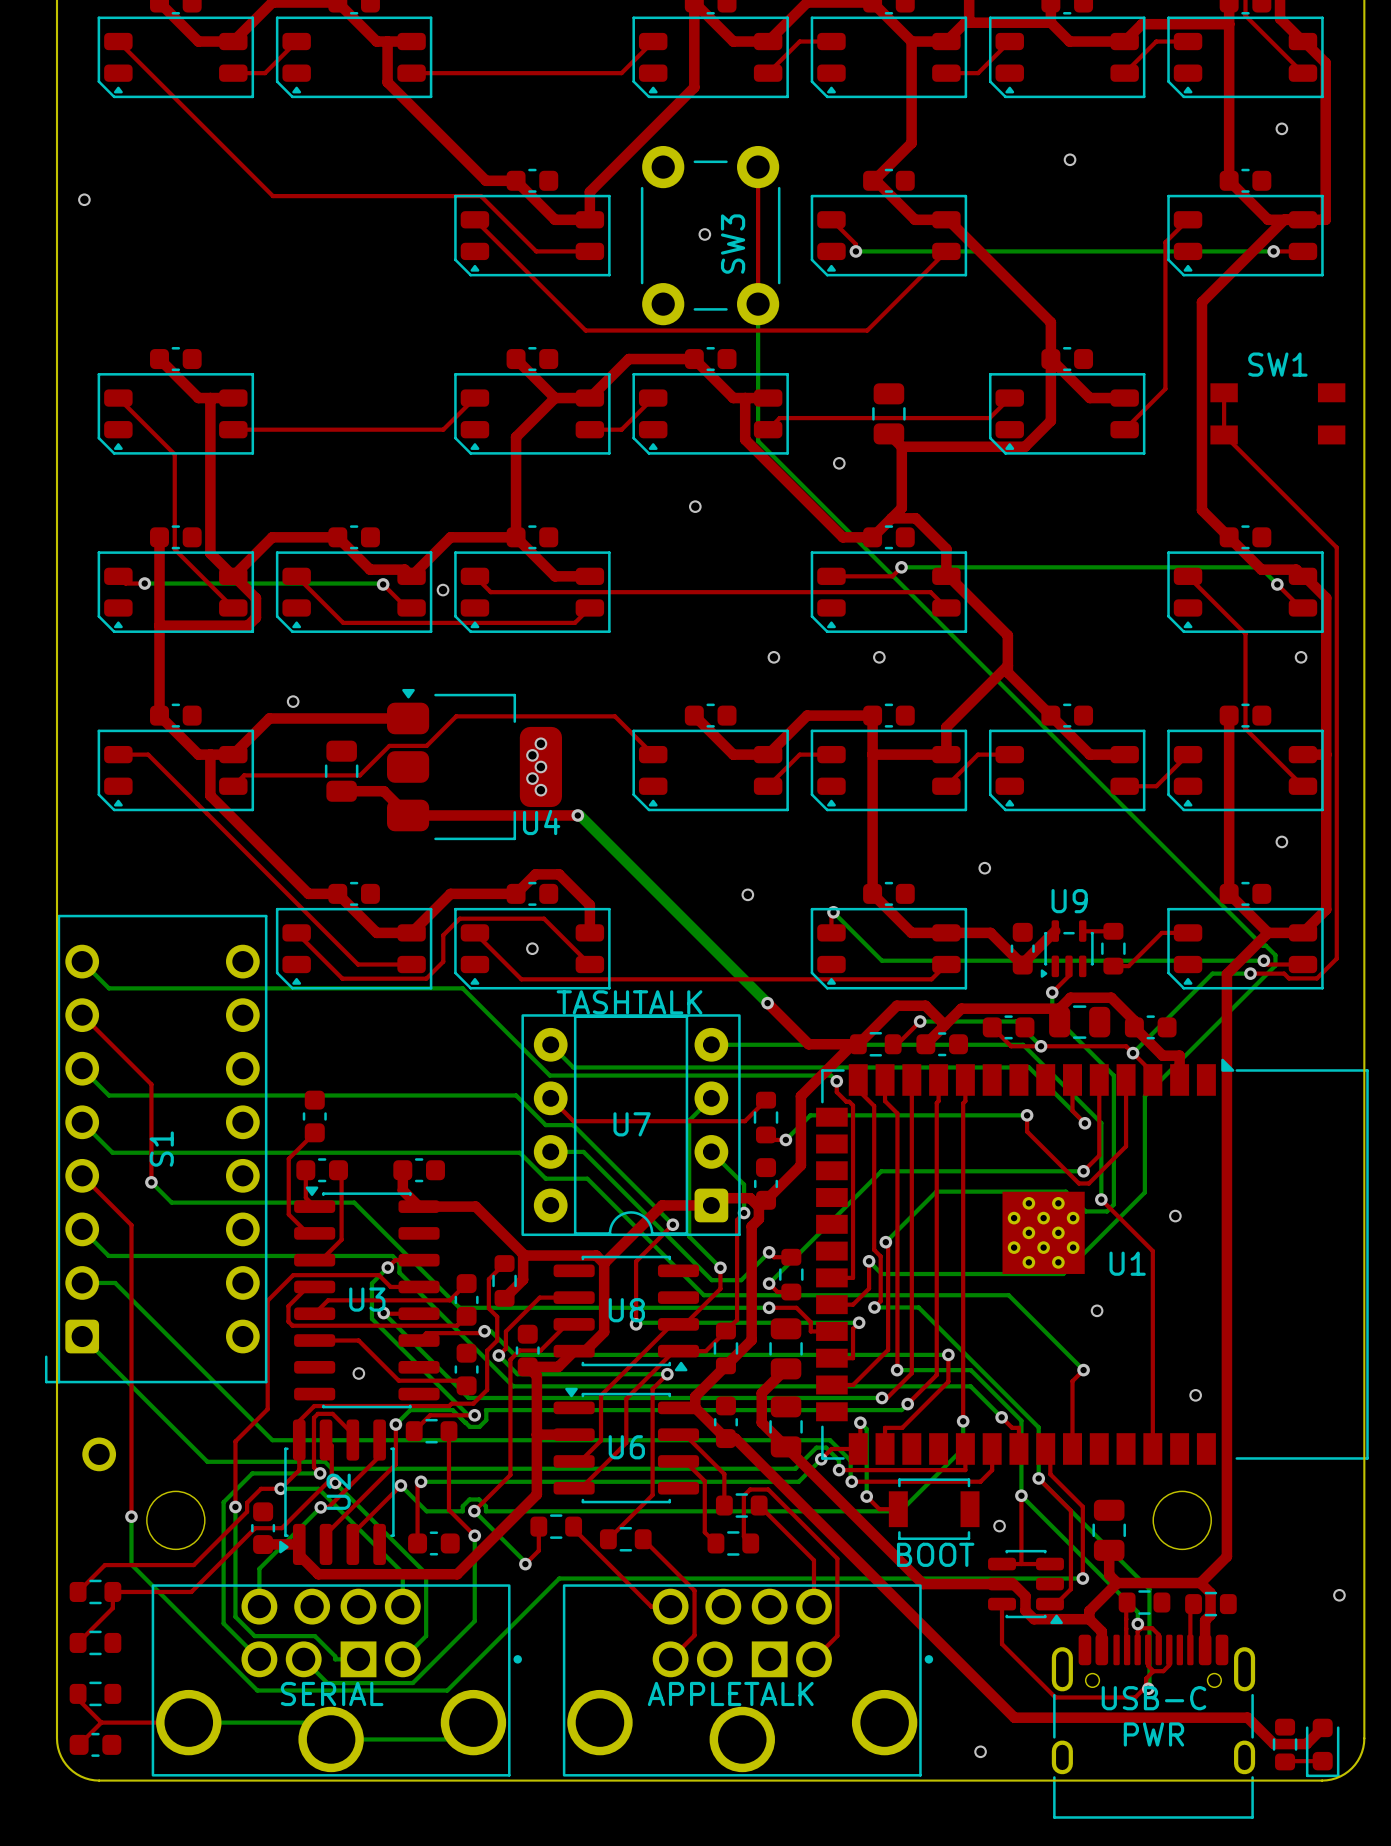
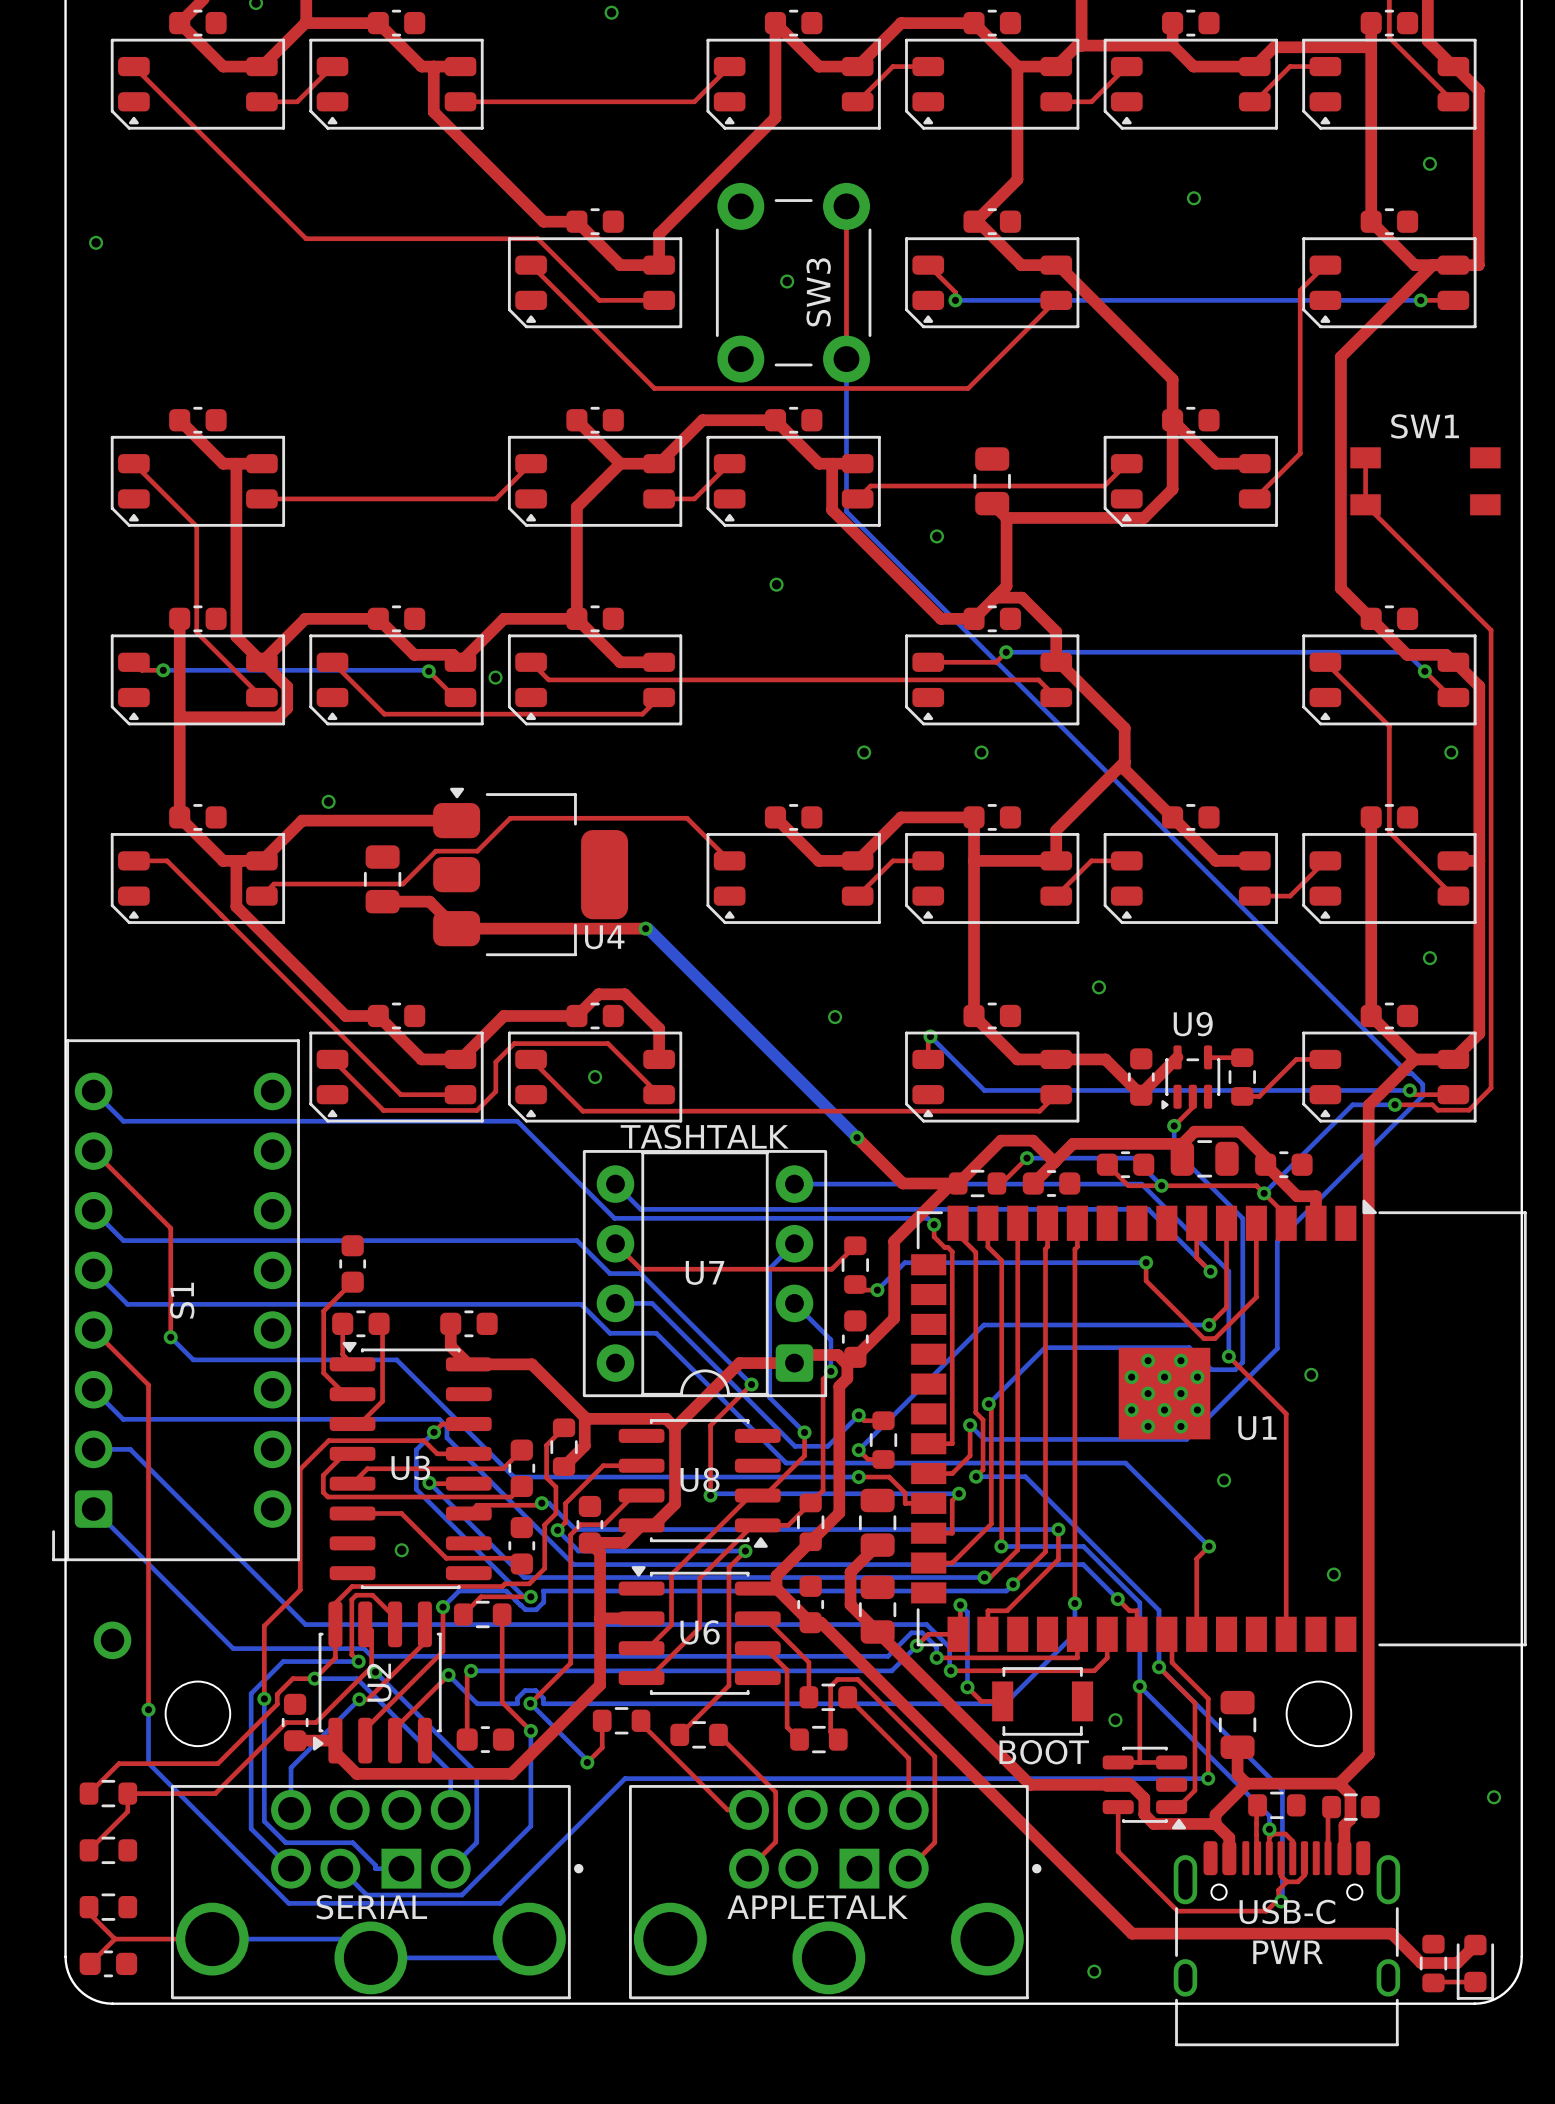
via: (540, 743) -> none
via: (532, 755) -> none
via: (540, 766) -> none
via: (532, 778) -> none
via: (540, 790) -> none

